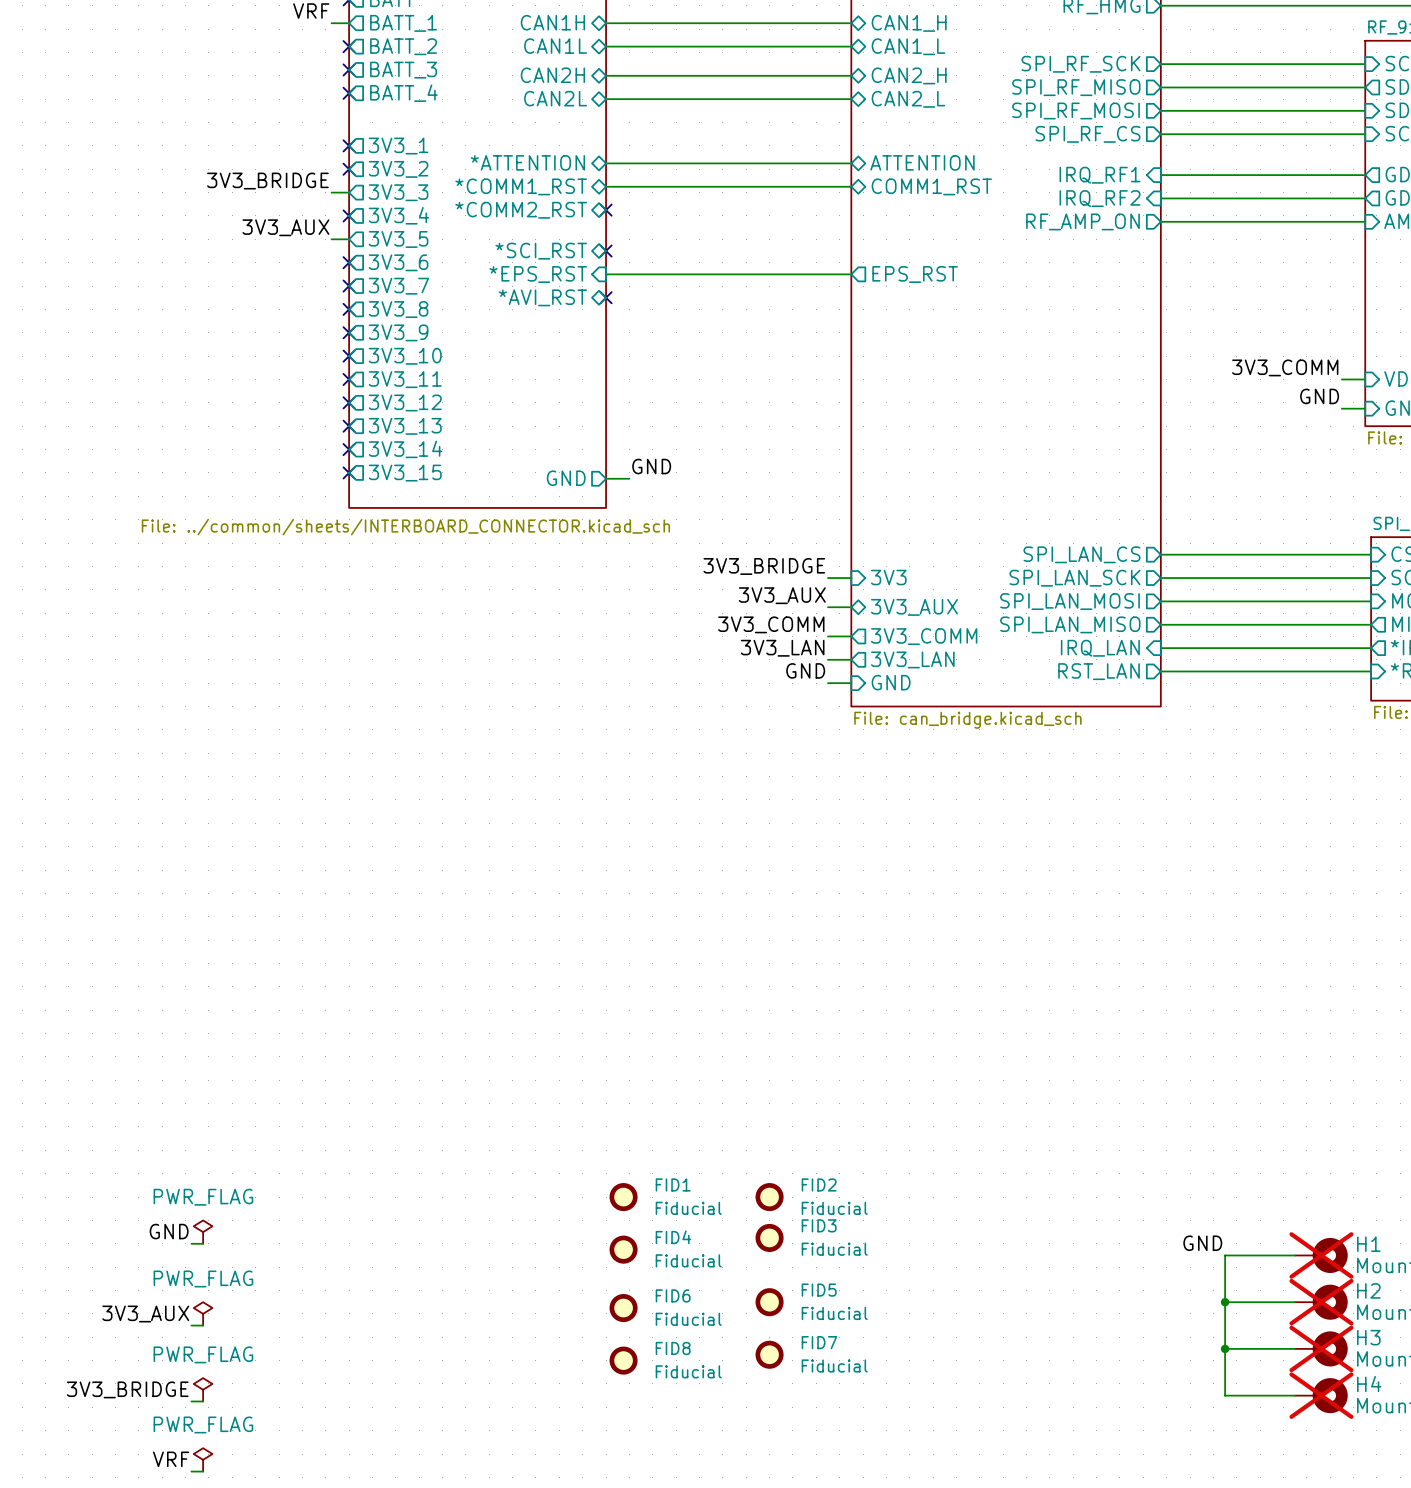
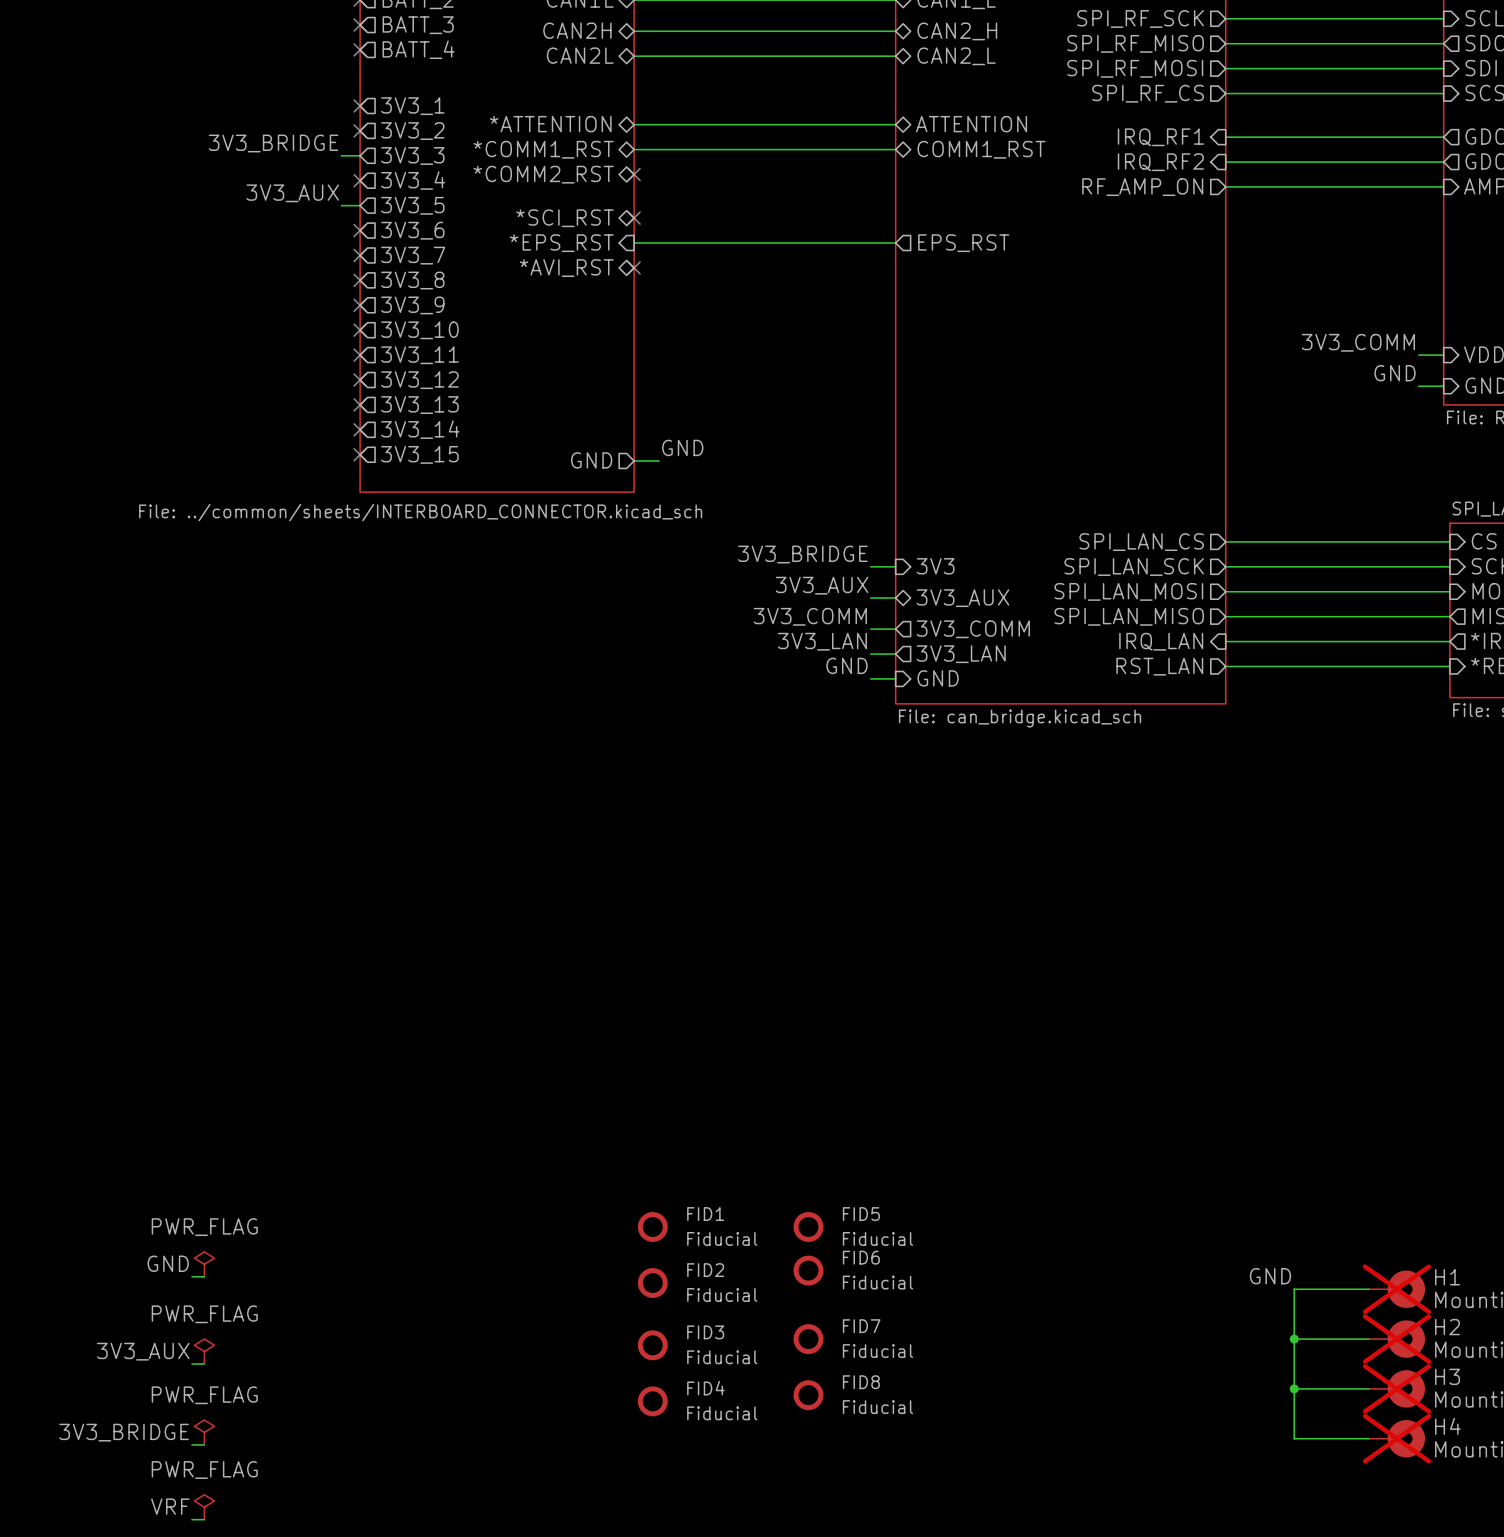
FID2 name: FID2 (819, 1184) -> FID5 (861, 1214)
FID3 name: FID3 (819, 1225) -> FID6 (861, 1257)
FID4 name: FID4 (673, 1237) -> FID2 (705, 1270)
FID5 name: FID5 (819, 1290) -> FID7 (861, 1326)
FID6 name: FID6 (673, 1295) -> FID3 (705, 1332)
FID7 name: FID7 (819, 1342) -> FID8 (861, 1382)
FID8 name: FID8 (673, 1348) -> FID4 (705, 1388)

